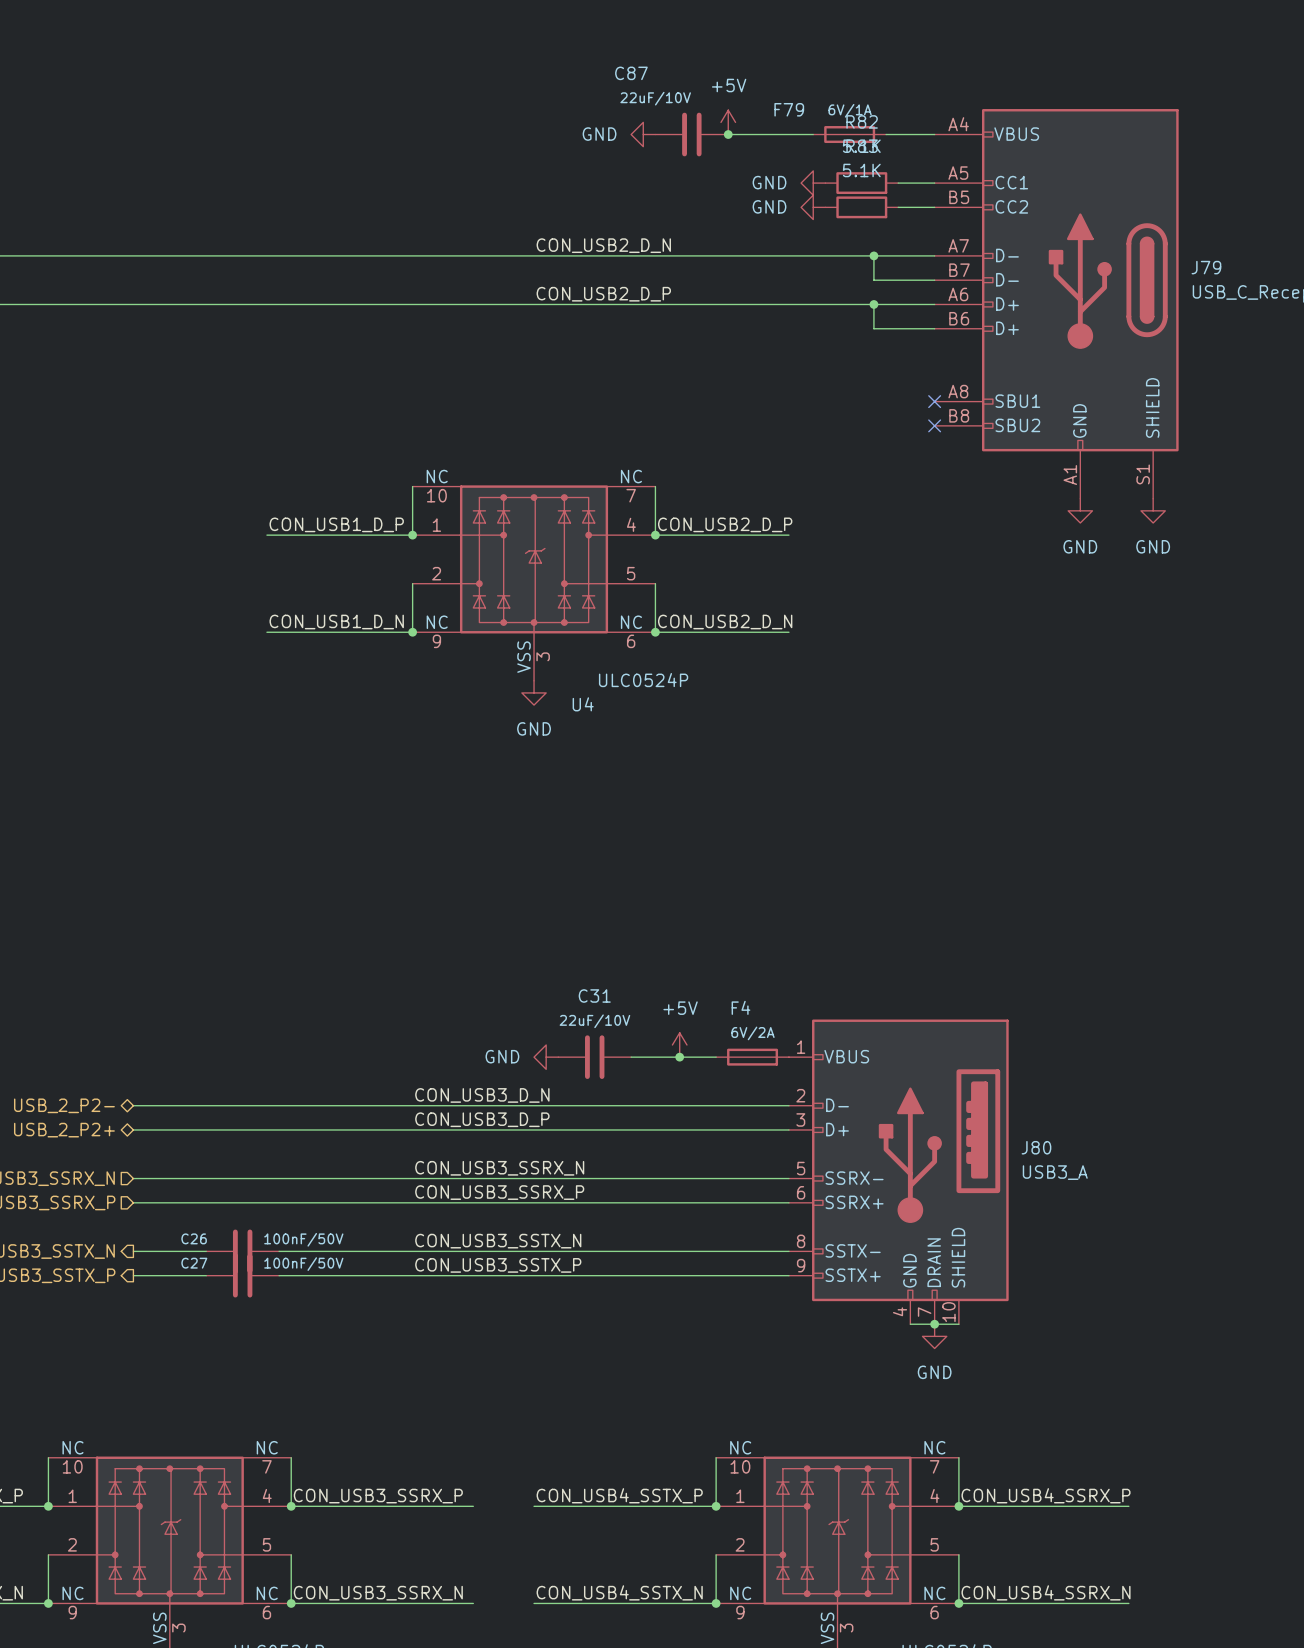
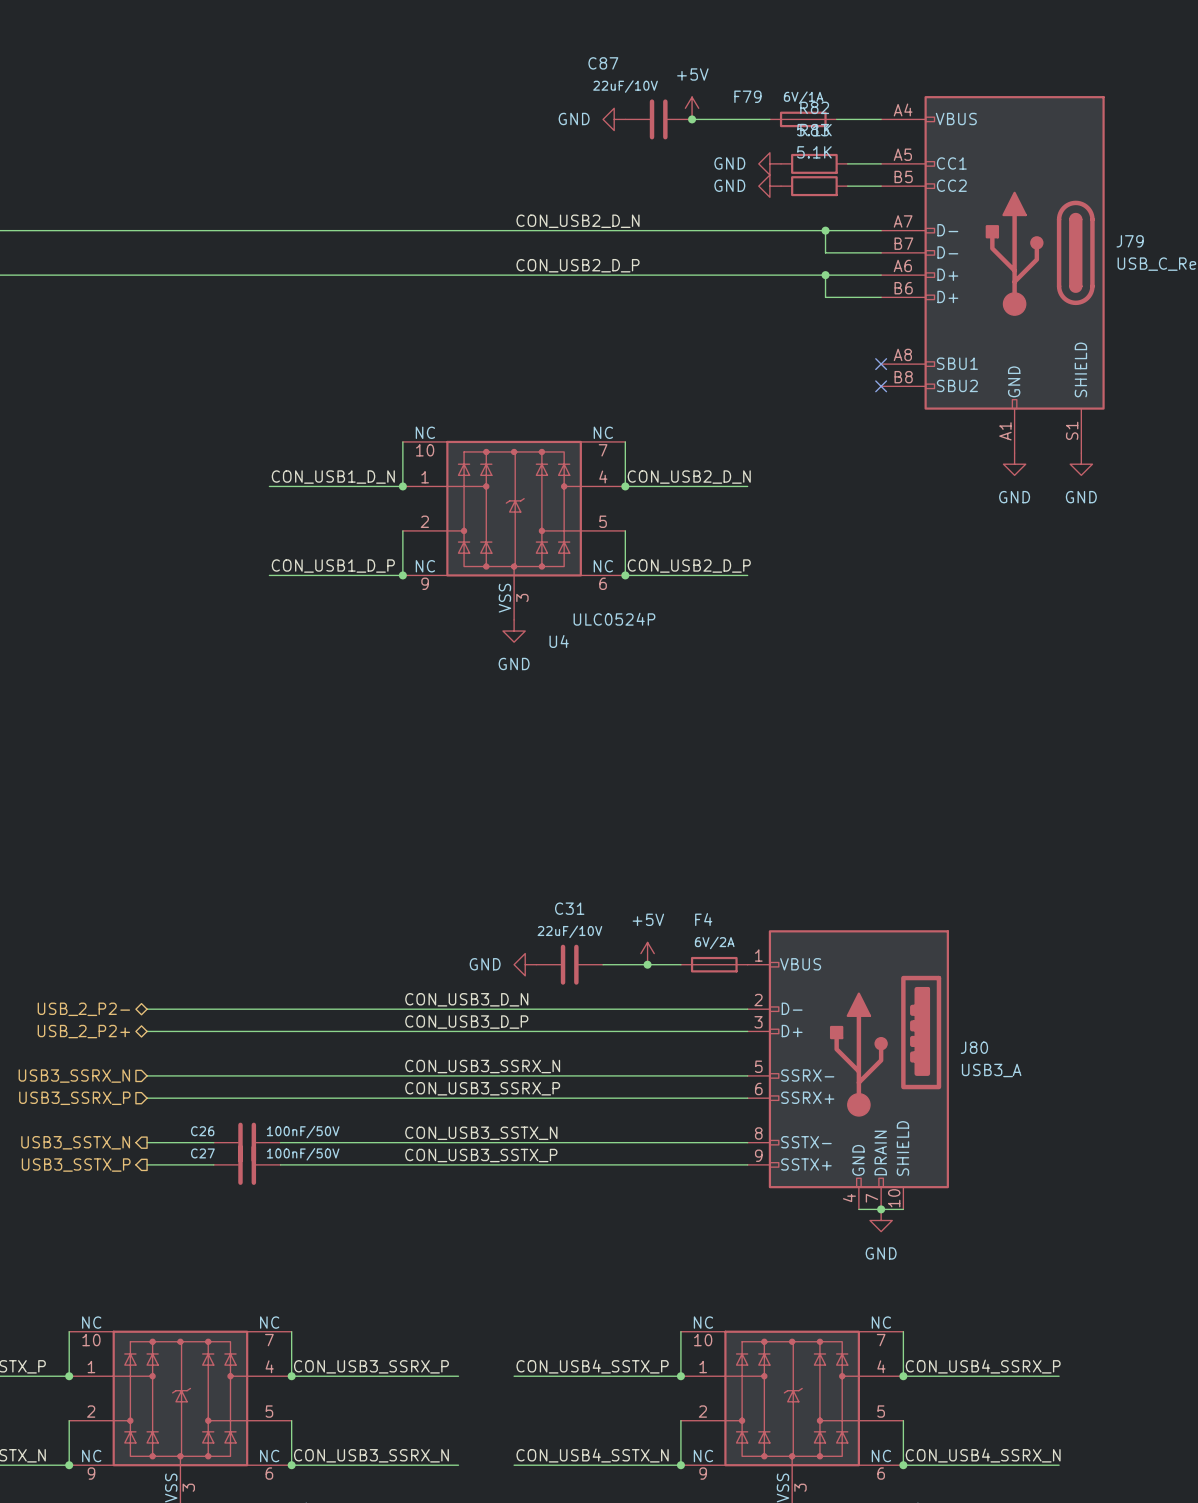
label: CON_USB1_D_P (336, 524) -> CON_USB1_D_N (333, 477)
label: CON_USB2_D_P (725, 524) -> CON_USB2_D_N (689, 477)
label: CON_USB1_D_N (336, 622) -> CON_USB1_D_P (333, 566)
label: CON_USB2_D_N (725, 622) -> CON_USB2_D_P (689, 566)

